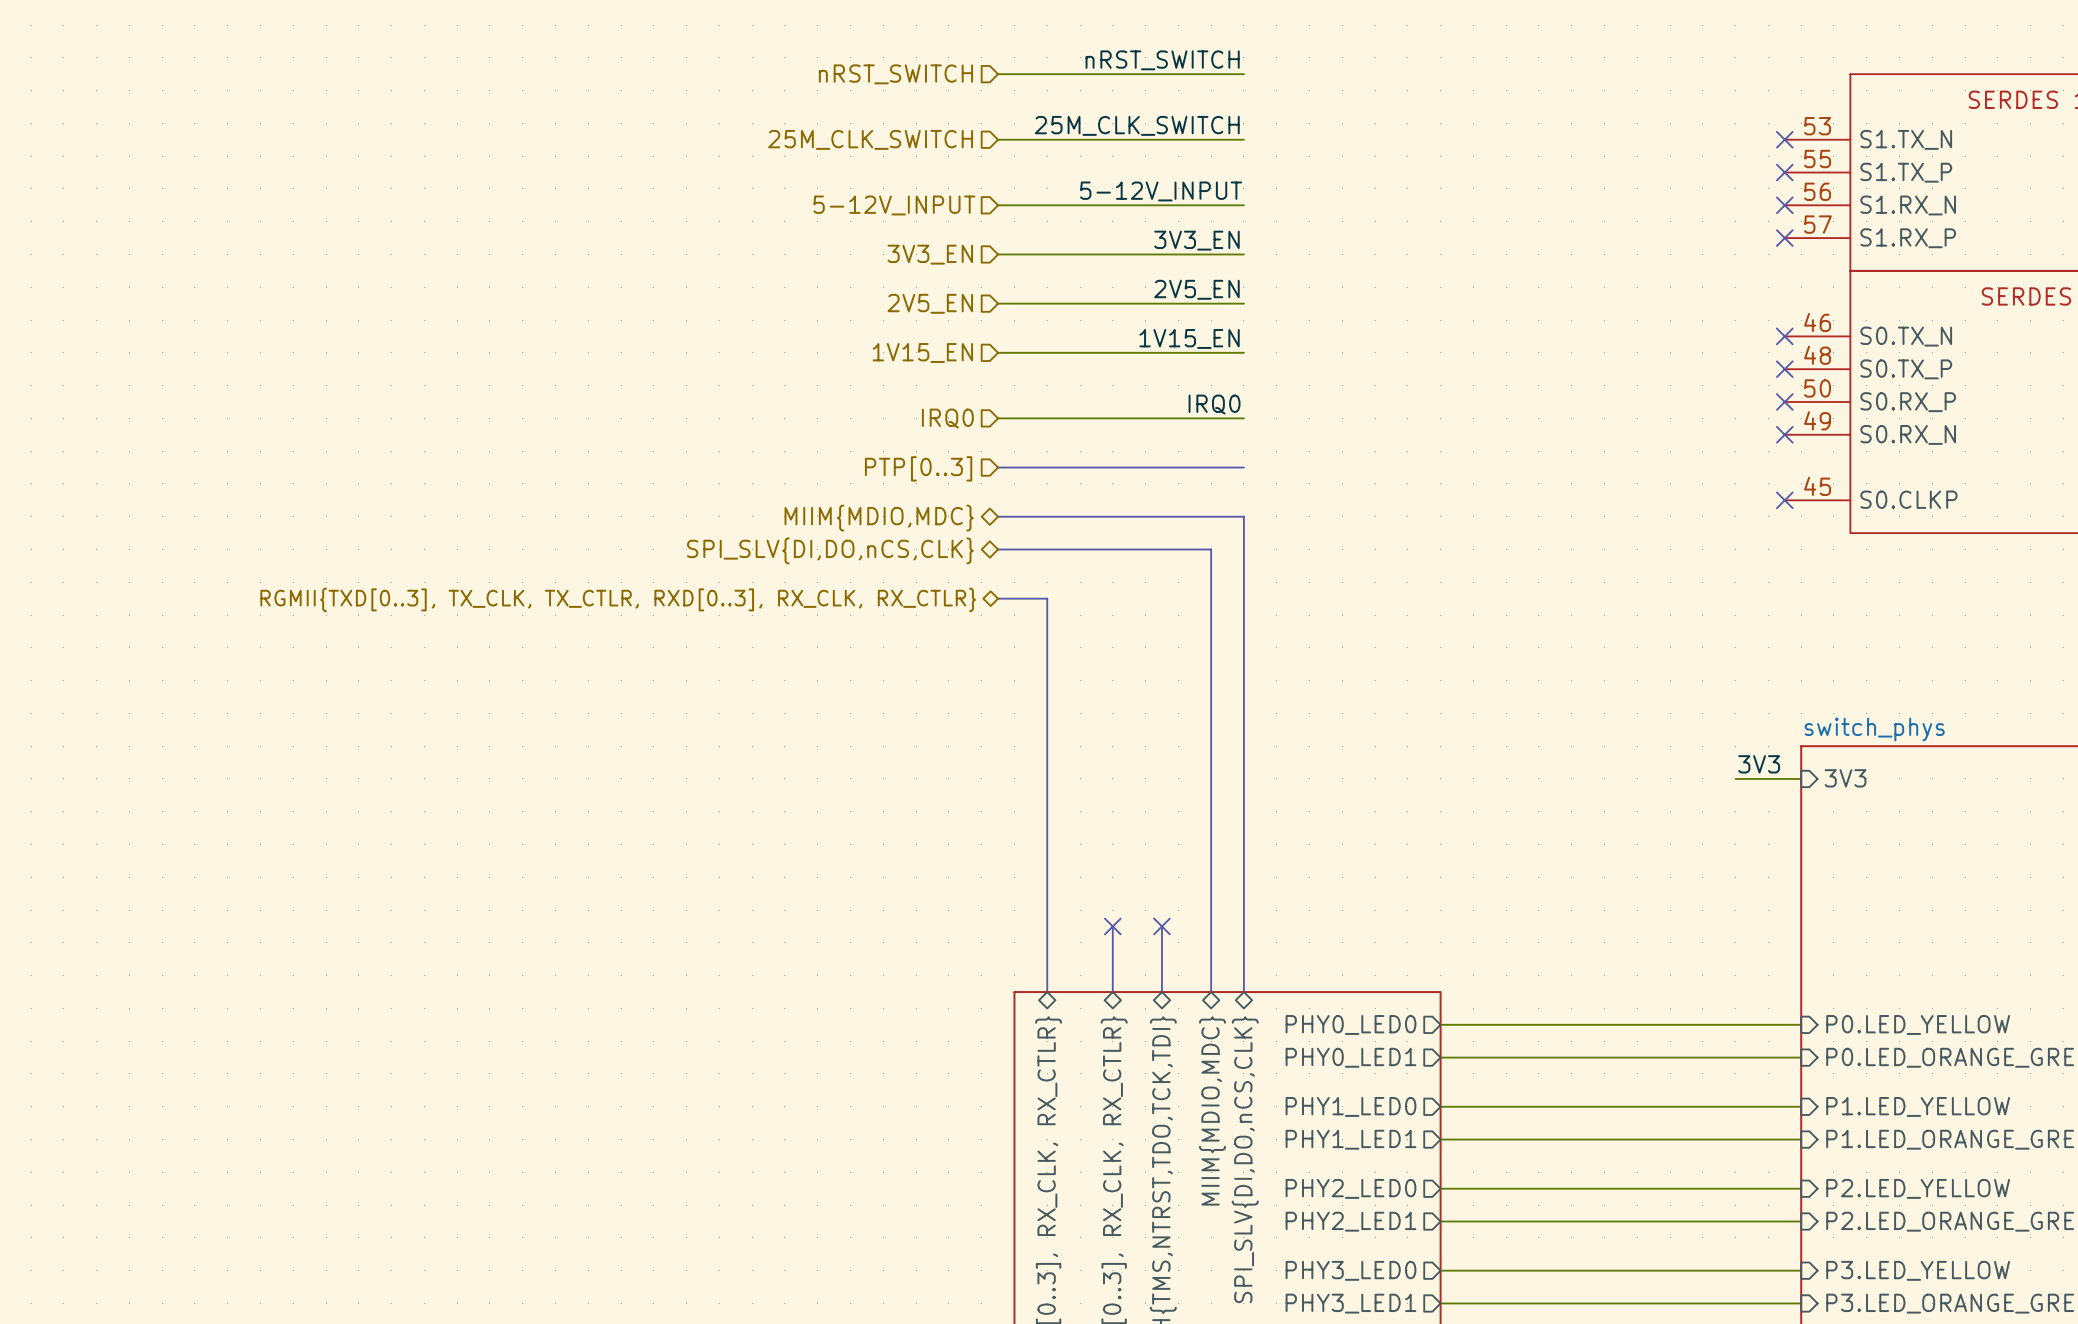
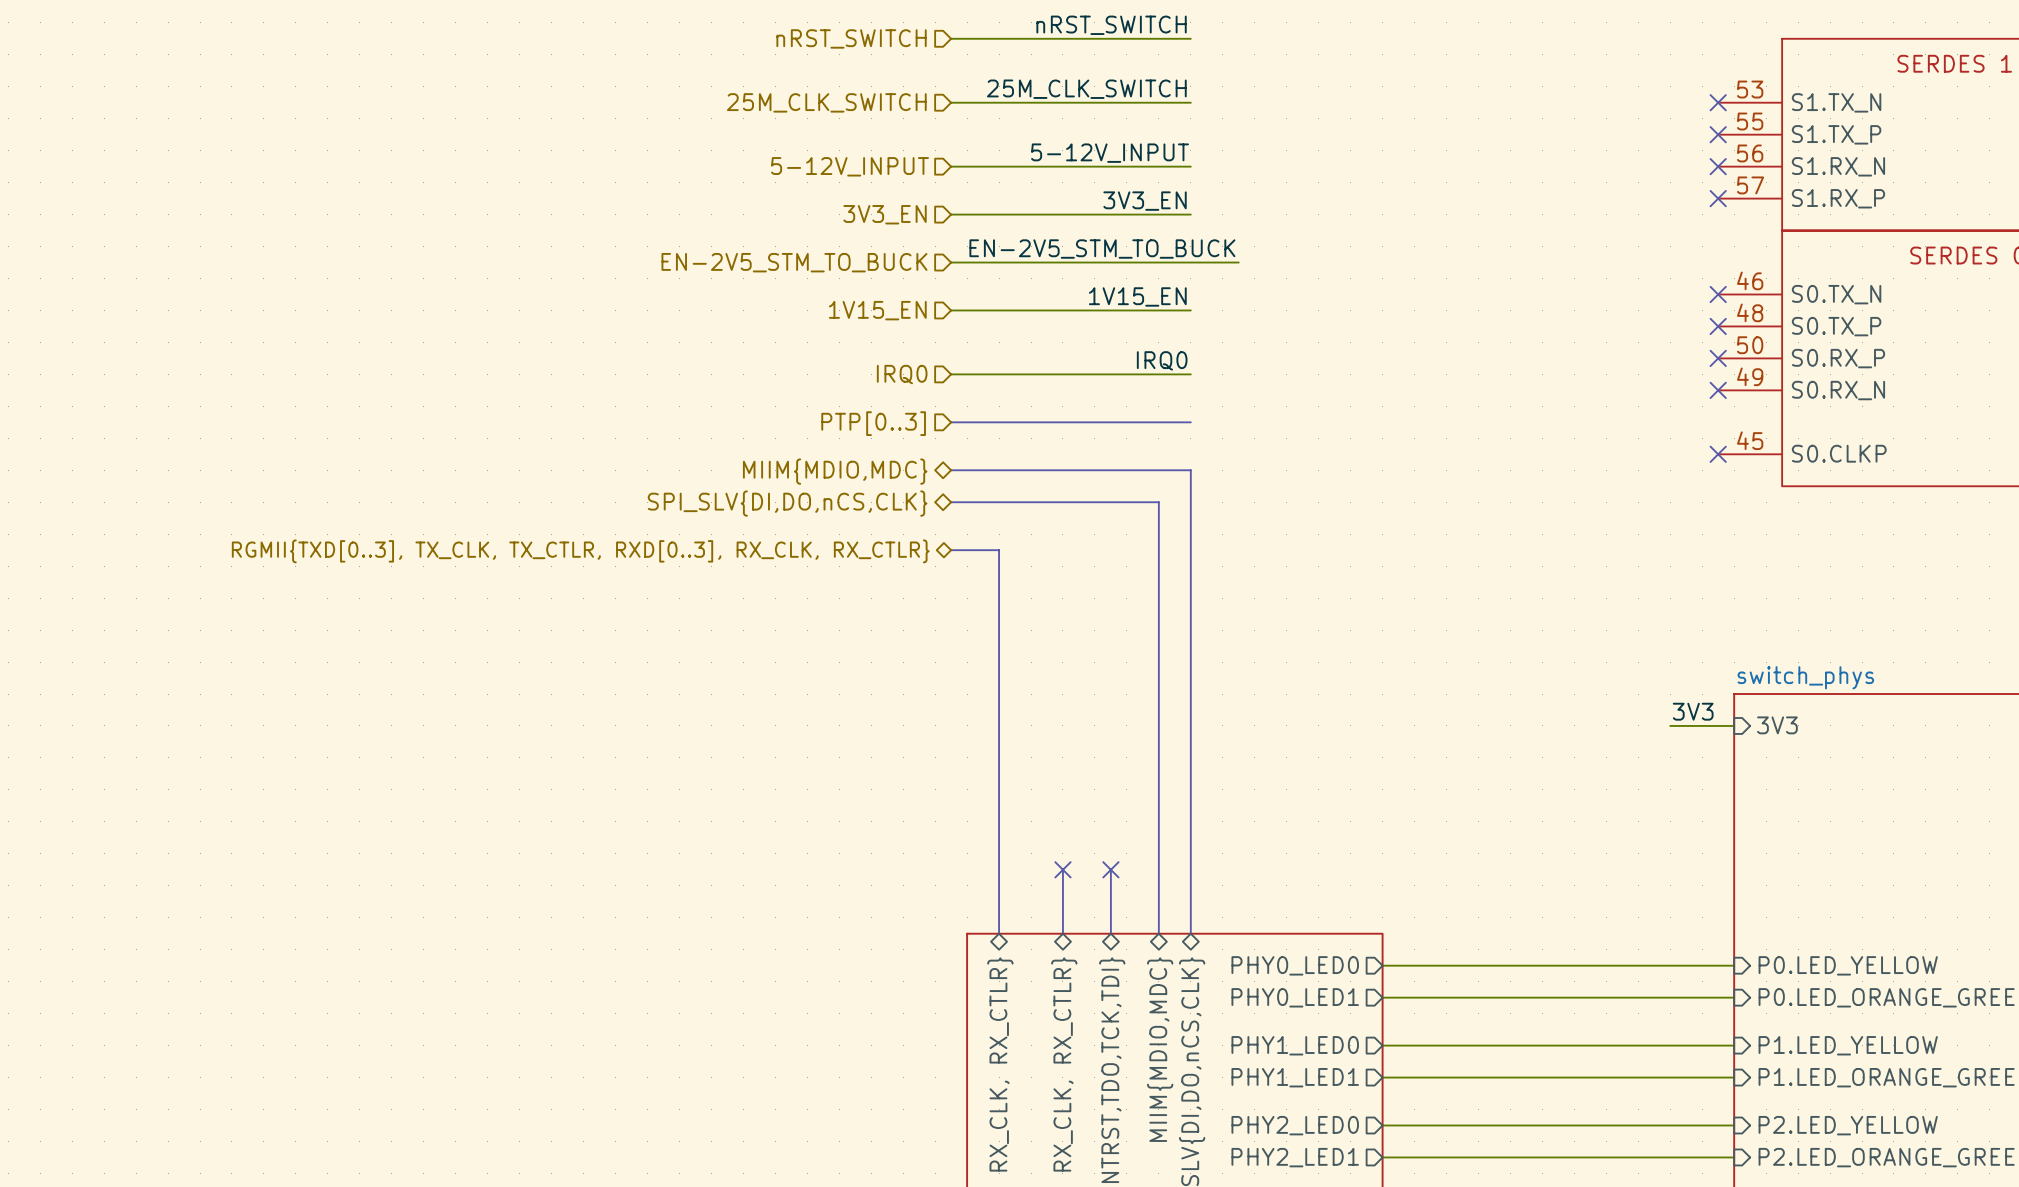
label: none -> EN-2V5_STM_TO_BUCK (1102, 249)
label: 2V5_EN (1196, 289) -> none
hierarchical label: 2V5_EN (930, 303) -> EN-2V5_STM_TO_BUCK (794, 262)
wire: none -> (1190, 262) (1238, 262)

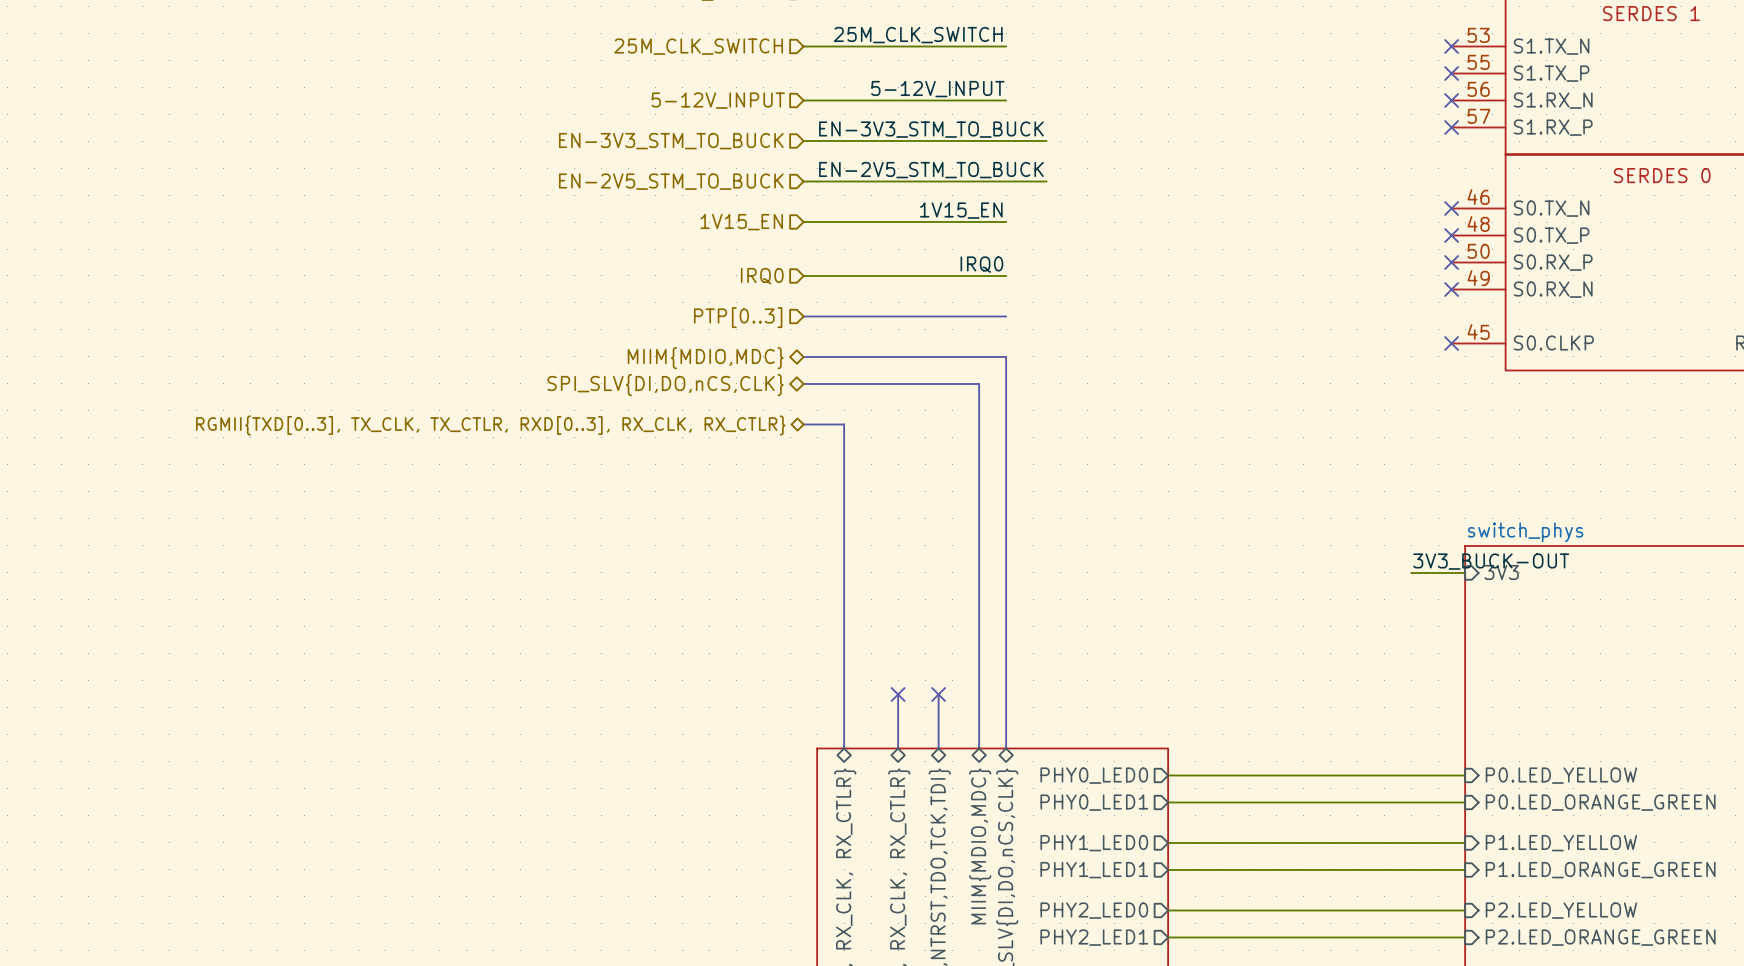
label: none -> EN-3V3_STM_TO_BUCK (931, 129)
label: 3V3_EN (1145, 201) -> none
hierarchical label: 3V3_EN (885, 214) -> EN-3V3_STM_TO_BUCK (671, 141)
wire: none -> (1006, 141) (1046, 141)
label: 3V3 (1693, 711) -> 3V3_BUCK-OUT (1491, 561)

